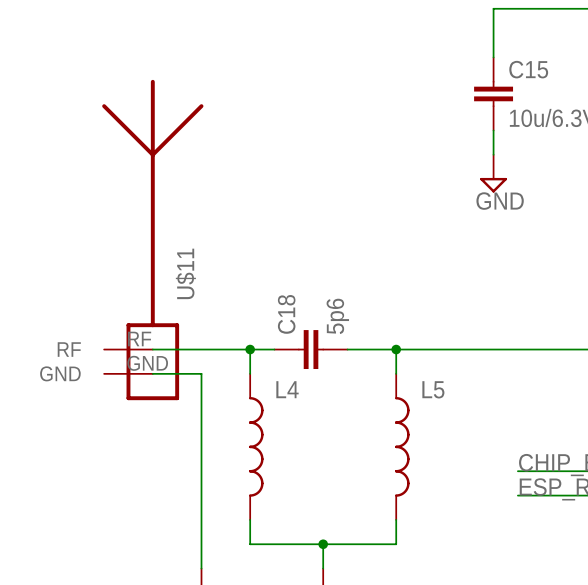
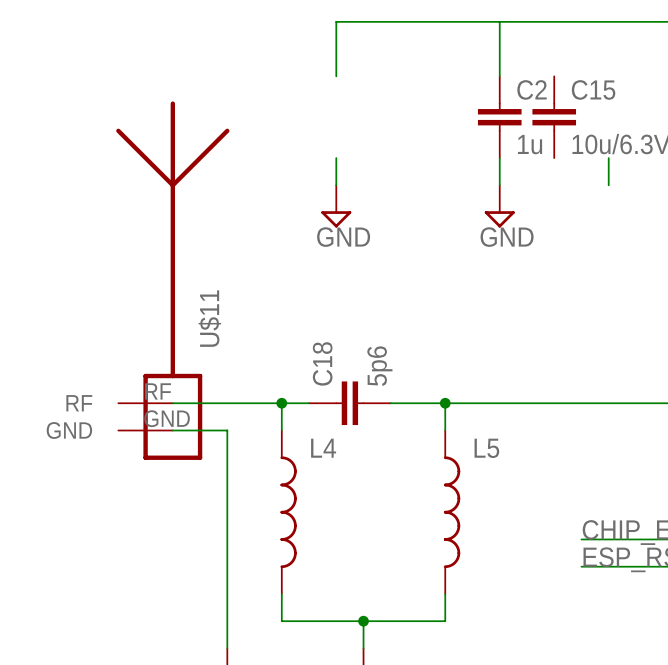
wire: none -> (499, 21) (499, 76)
wire: (493, 8) (493, 57) -> (554, 21) (336, 21) (336, 76)
C2: none -> 1u (499, 117)
wire: none -> (336, 158) (336, 185)
wire: (493, 130) (493, 154) -> (499, 158) (499, 185)
wire: none -> (608, 158) (608, 185)
power symbol: none -> GND (336, 206)
power symbol position: GND (493, 173) -> GND (499, 206)

